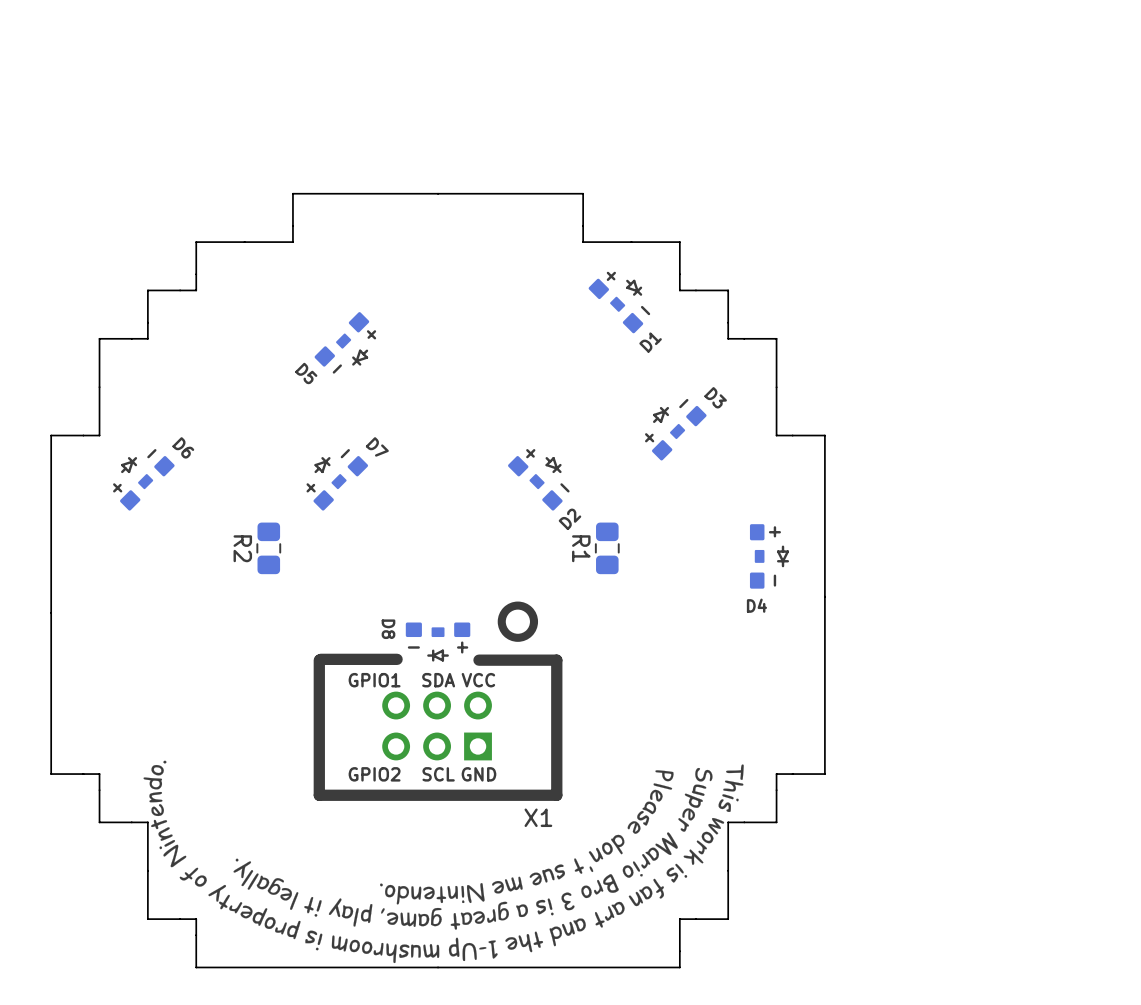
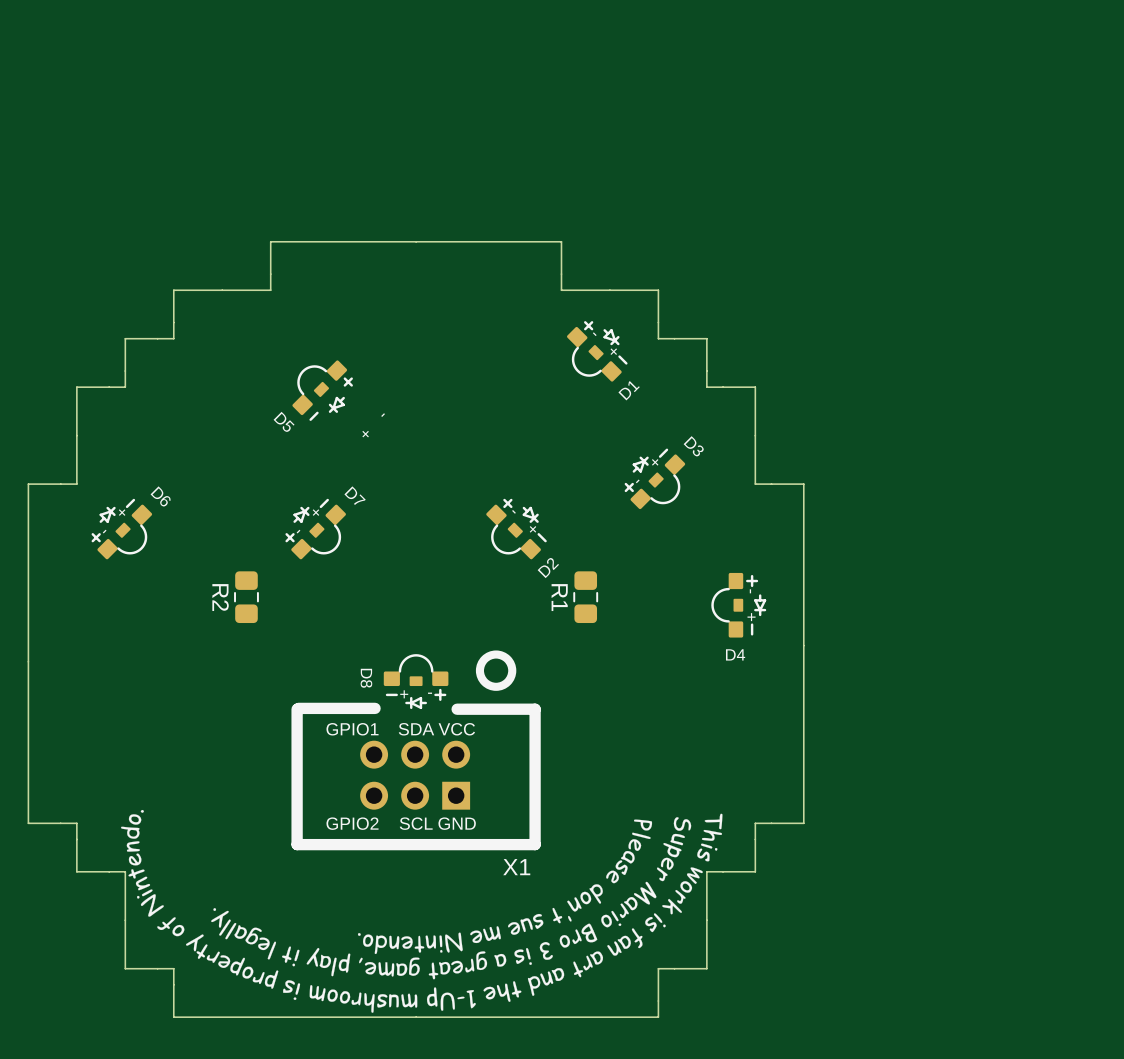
D1 footprint: [588, 271, 651, 334] -> [566, 321, 628, 382]
D5 footprint: [314, 312, 377, 374] -> [292, 360, 353, 421]
D3 footprint: [645, 398, 707, 461] -> [624, 448, 686, 510]
D6 footprint: [113, 449, 175, 511] -> [91, 498, 153, 560]
D7 footprint: [306, 449, 369, 511] -> [285, 498, 346, 560]
D2 footprint: [508, 449, 570, 511] -> [486, 498, 547, 560]
D4 footprint: [749, 524, 790, 589] -> [711, 572, 767, 638]
D8 footprint: [405, 622, 471, 662] -> [383, 654, 449, 710]

